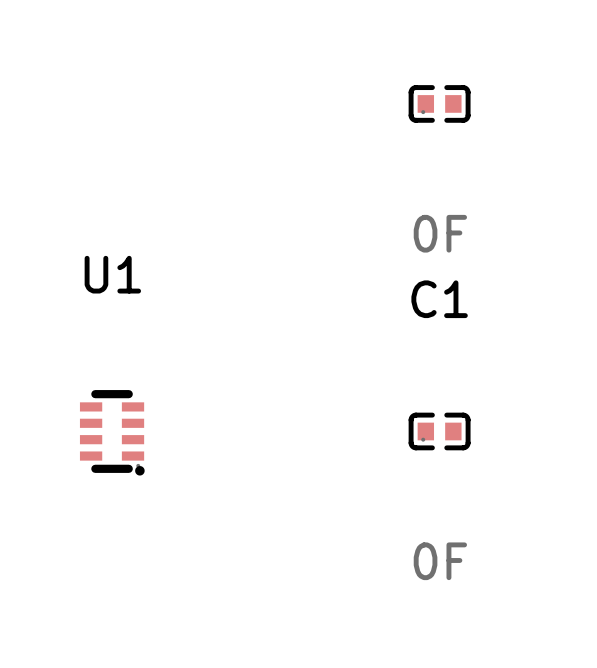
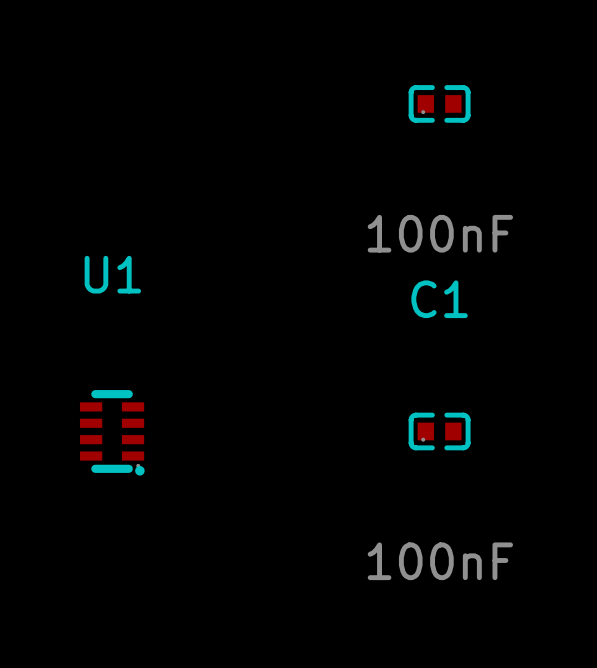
part value: 0F (440, 233) -> 100nF (440, 233)
C1 value: 0F (440, 561) -> 100nF (440, 561)

